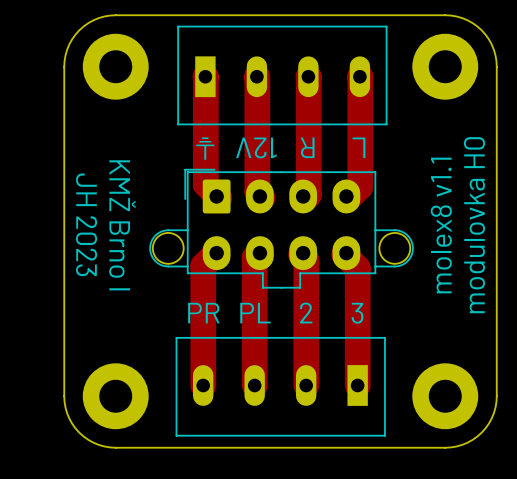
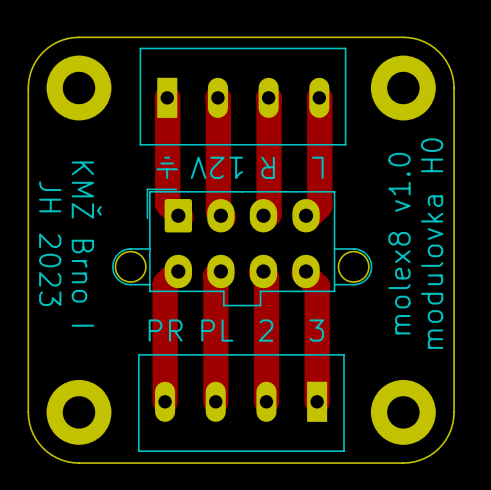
text: molex8 v1.1 (441, 225) -> molex8 v1.0 (399, 243)

